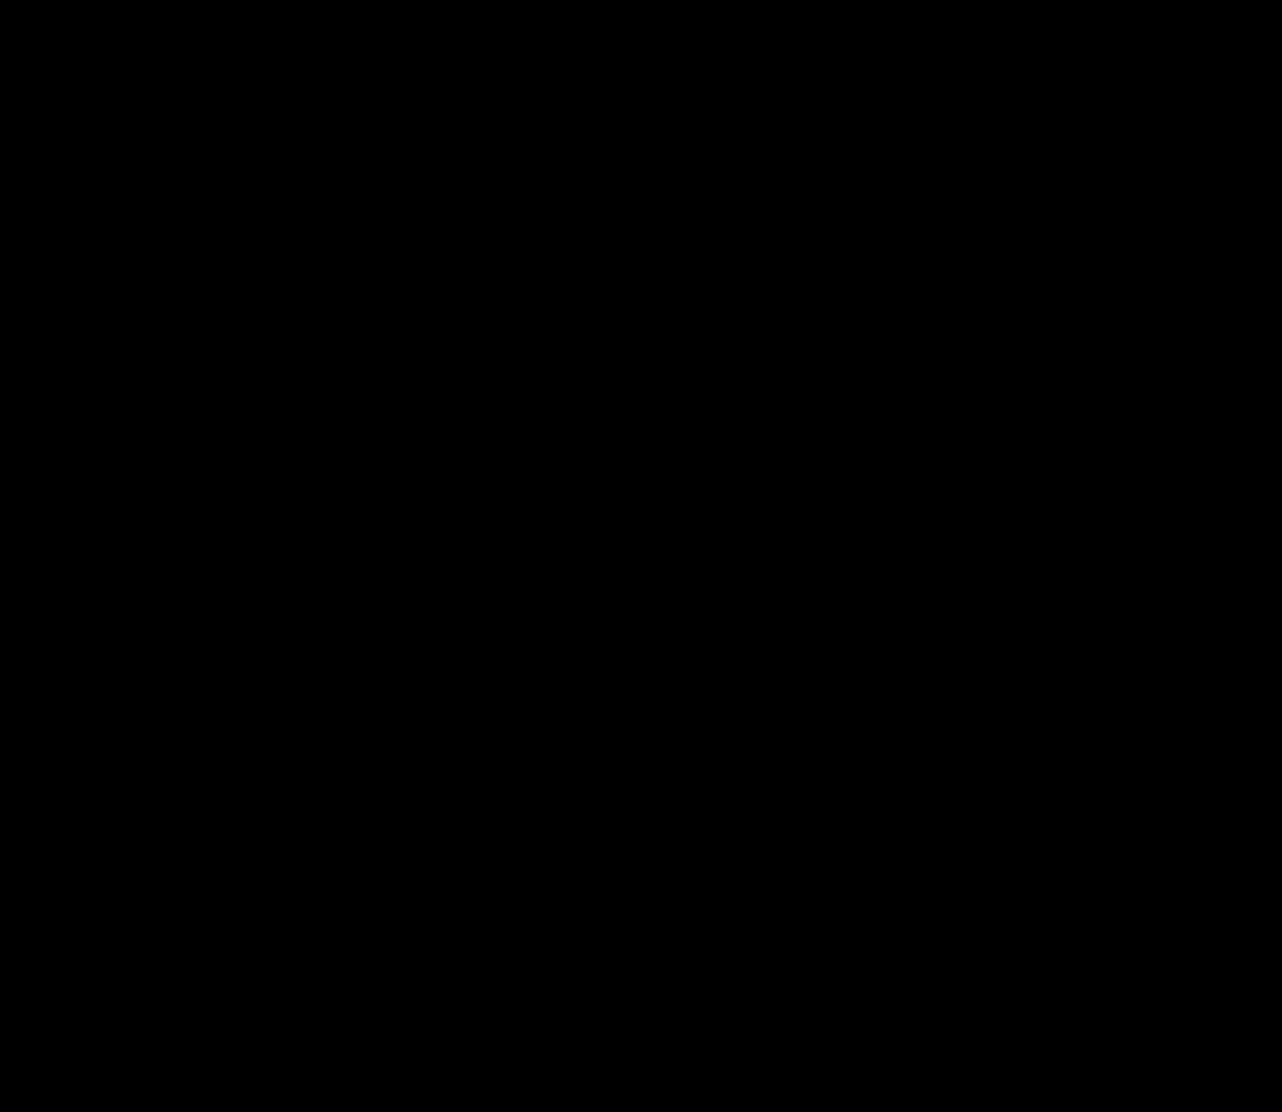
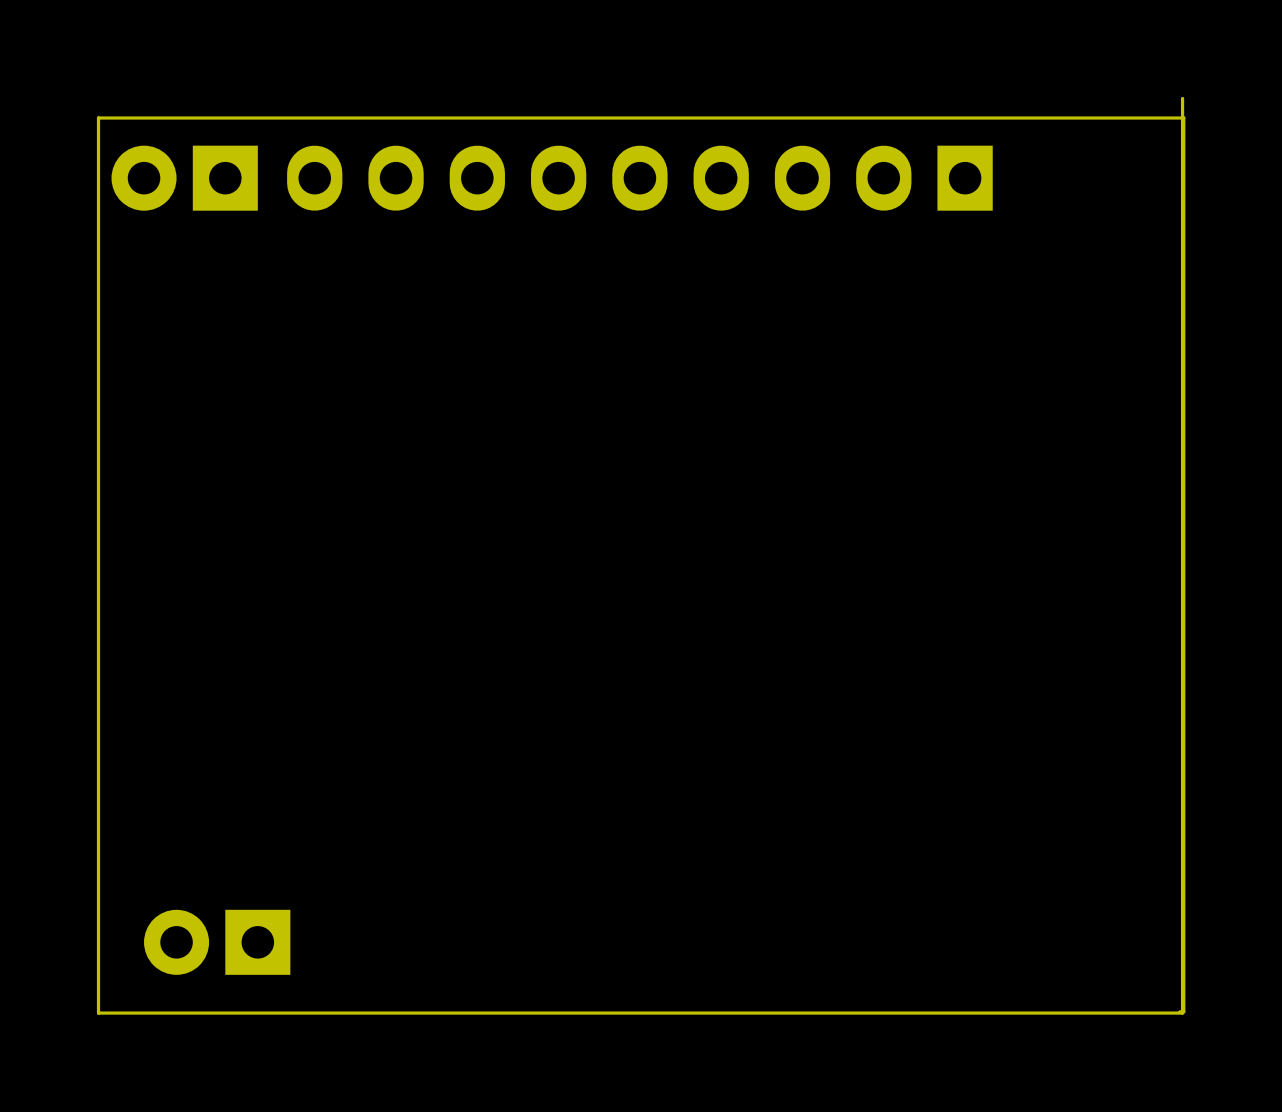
board edge: none -> (1182, 98) (1182, 1013) (98, 1013) (98, 118) (1183, 118) (1183, 1011) (1180, 1011)
part: none -> (184, 178)
part: none -> (639, 178)
part: none -> (217, 942)

